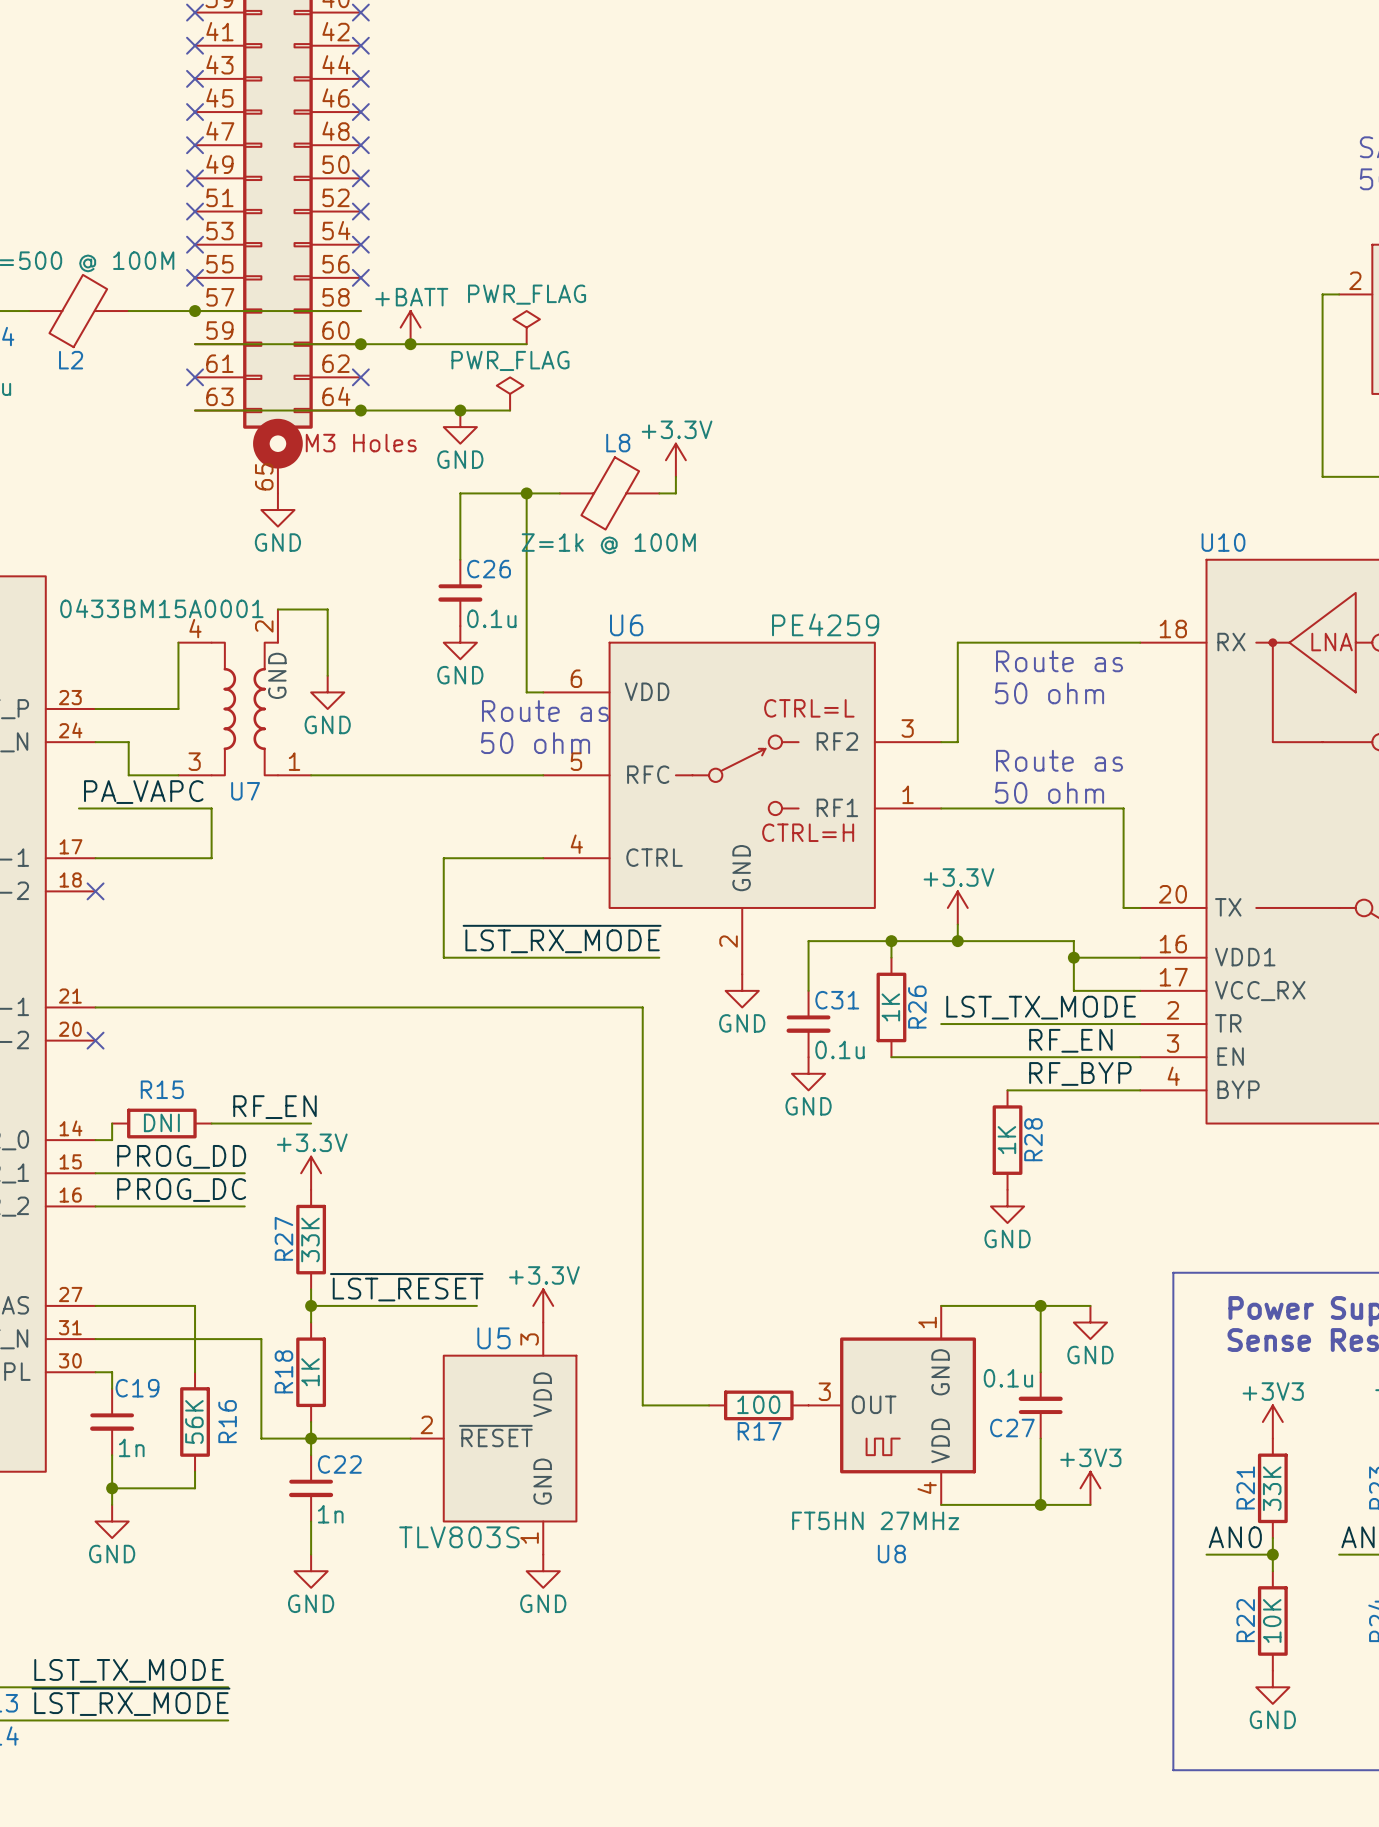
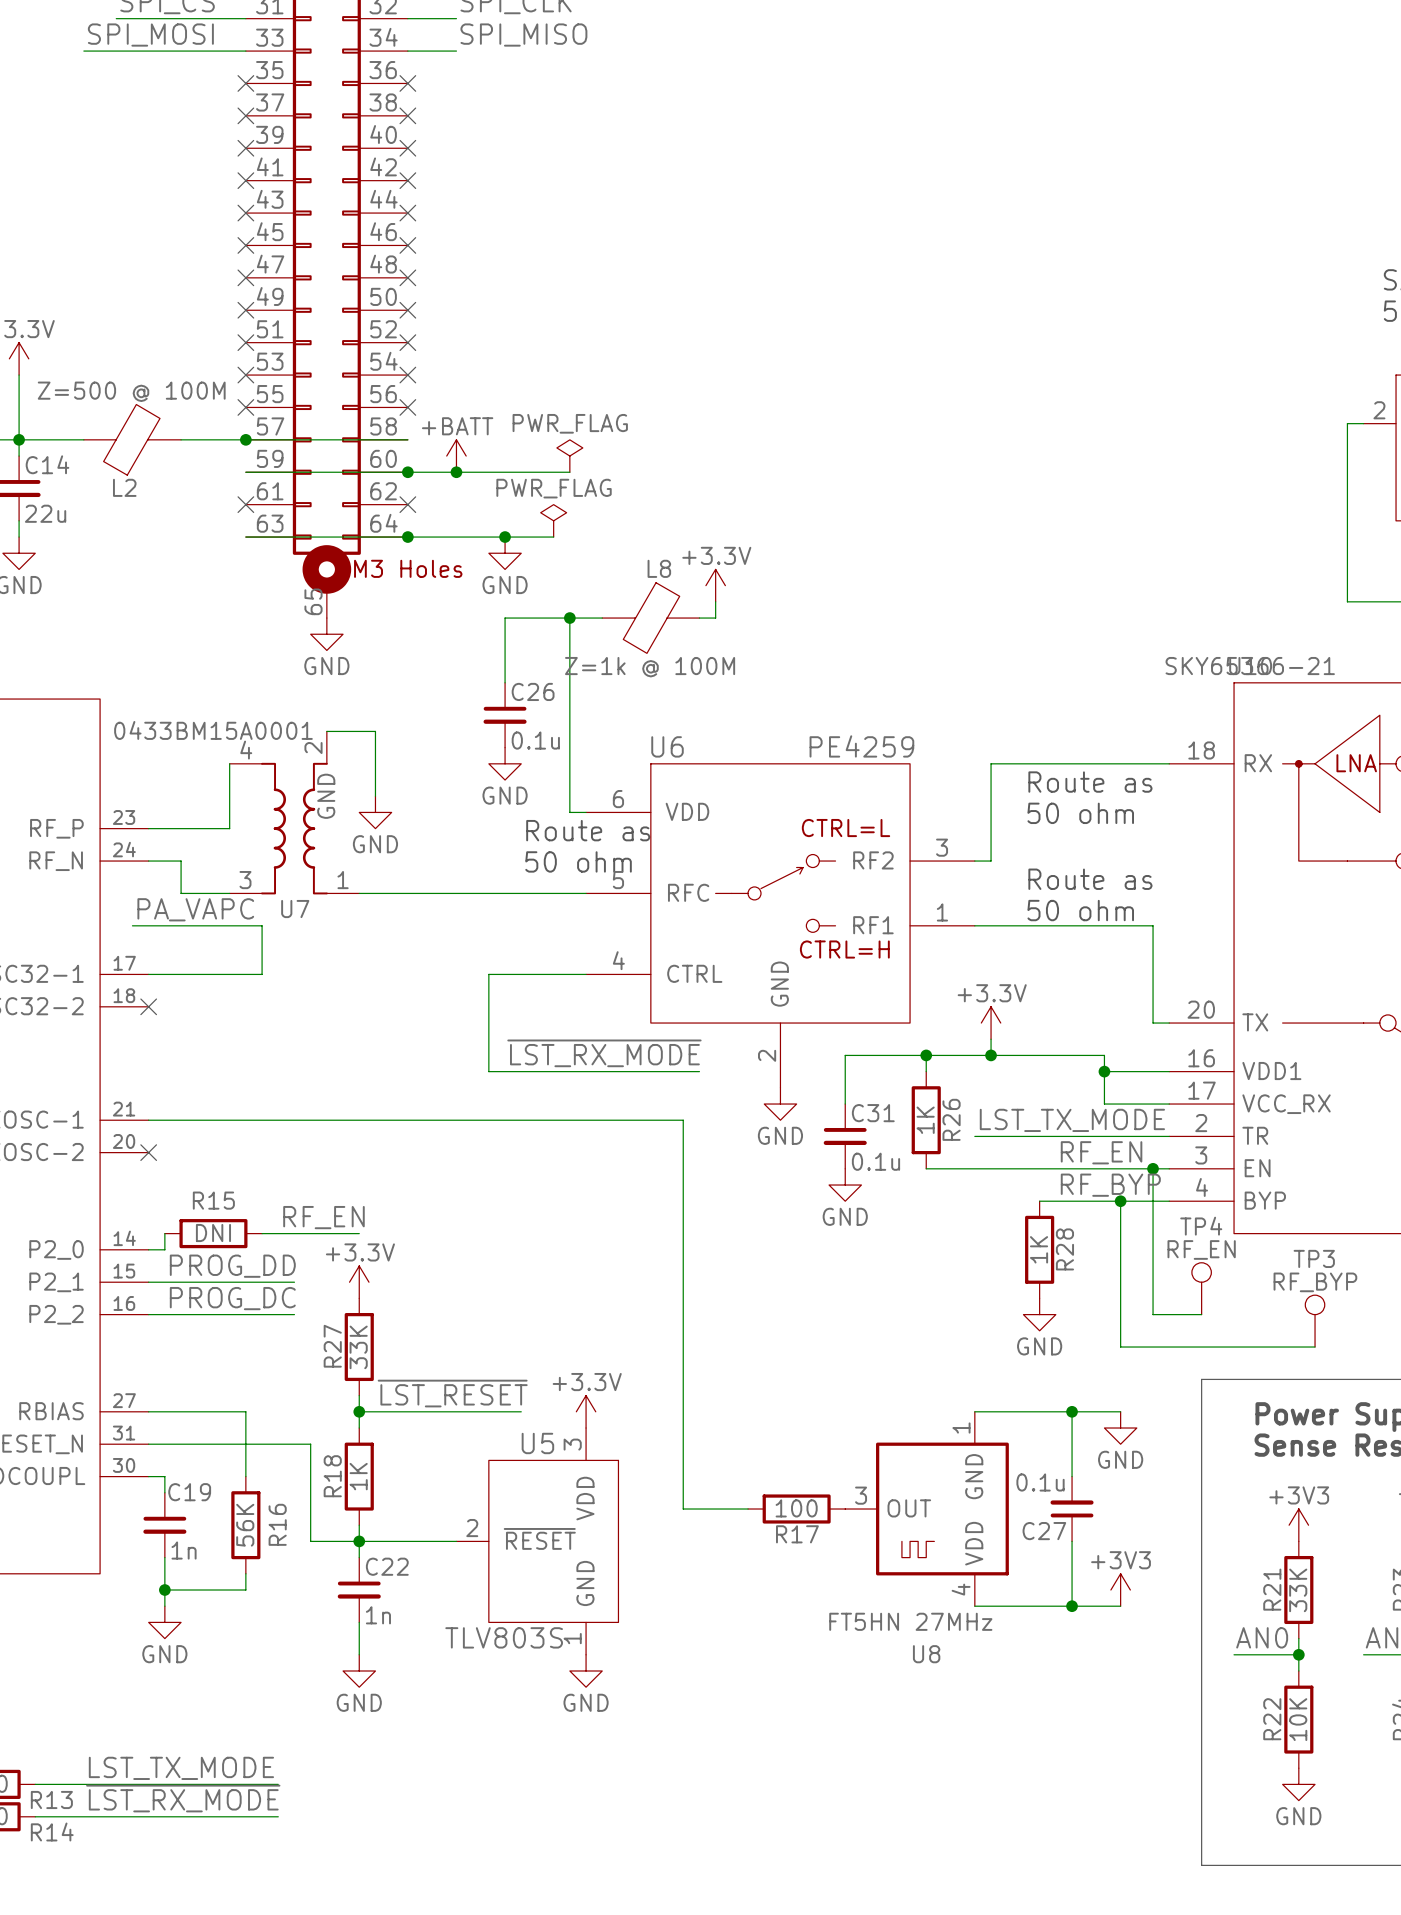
U10 value: none -> SKY65366-21 (1250, 666)
wire: none -> (1153, 1168) (1153, 1314) (1201, 1314)
junction: none -> (1153, 1168)
wire: none -> (1120, 1201) (1120, 1347) (1315, 1347)
junction: none -> (1120, 1201)
TP4: none -> RF_EN (1201, 1288)
TP3: none -> RF_BYP (1315, 1321)

